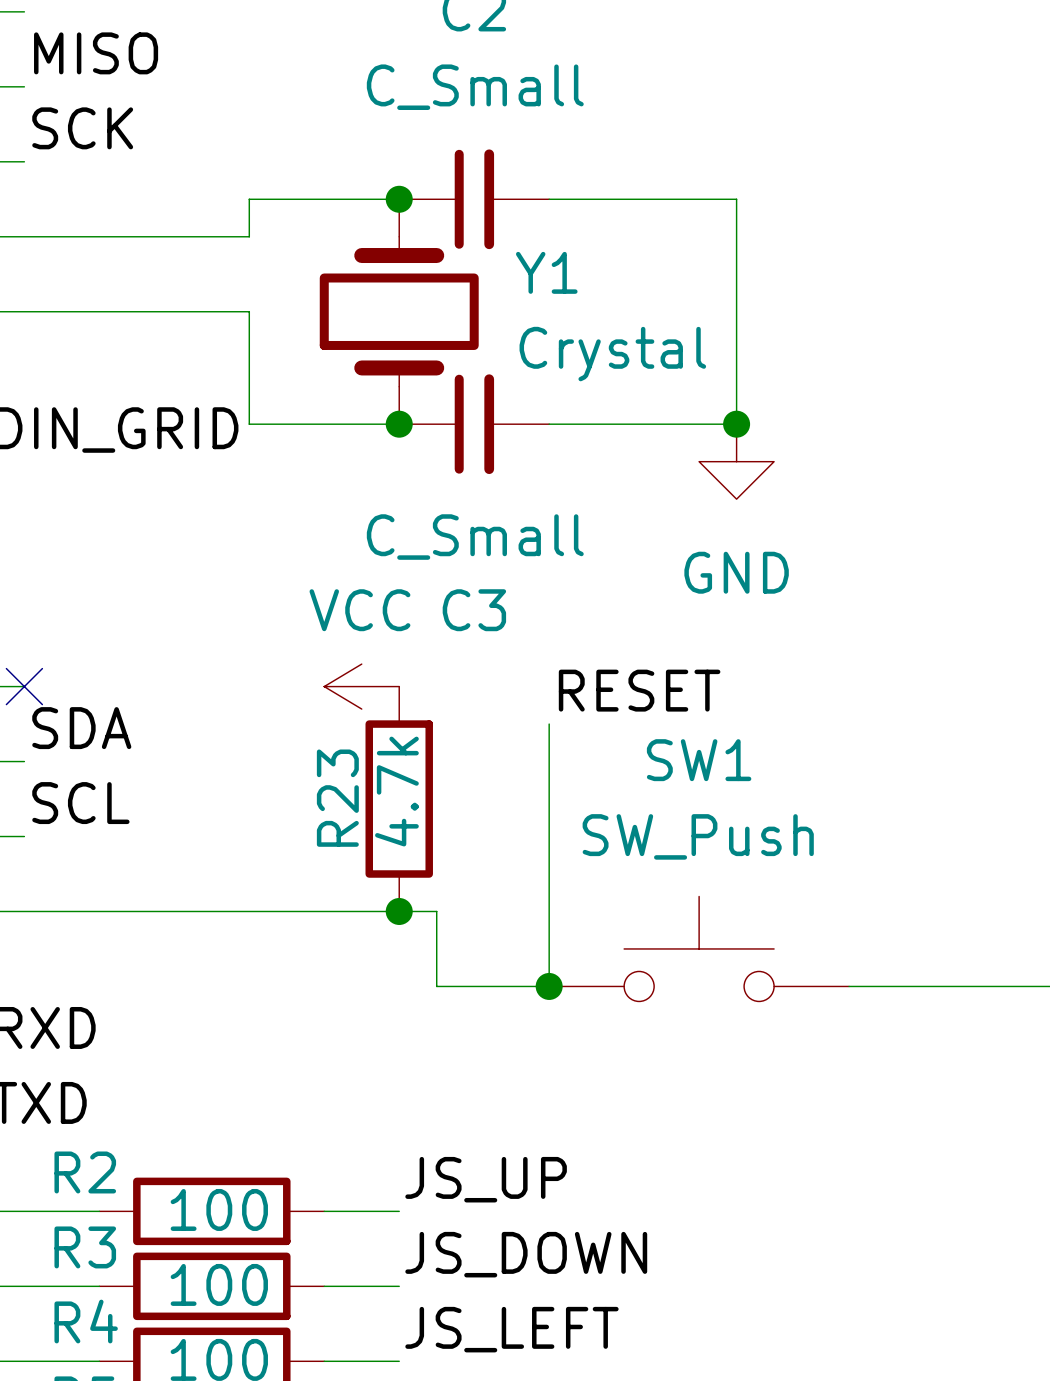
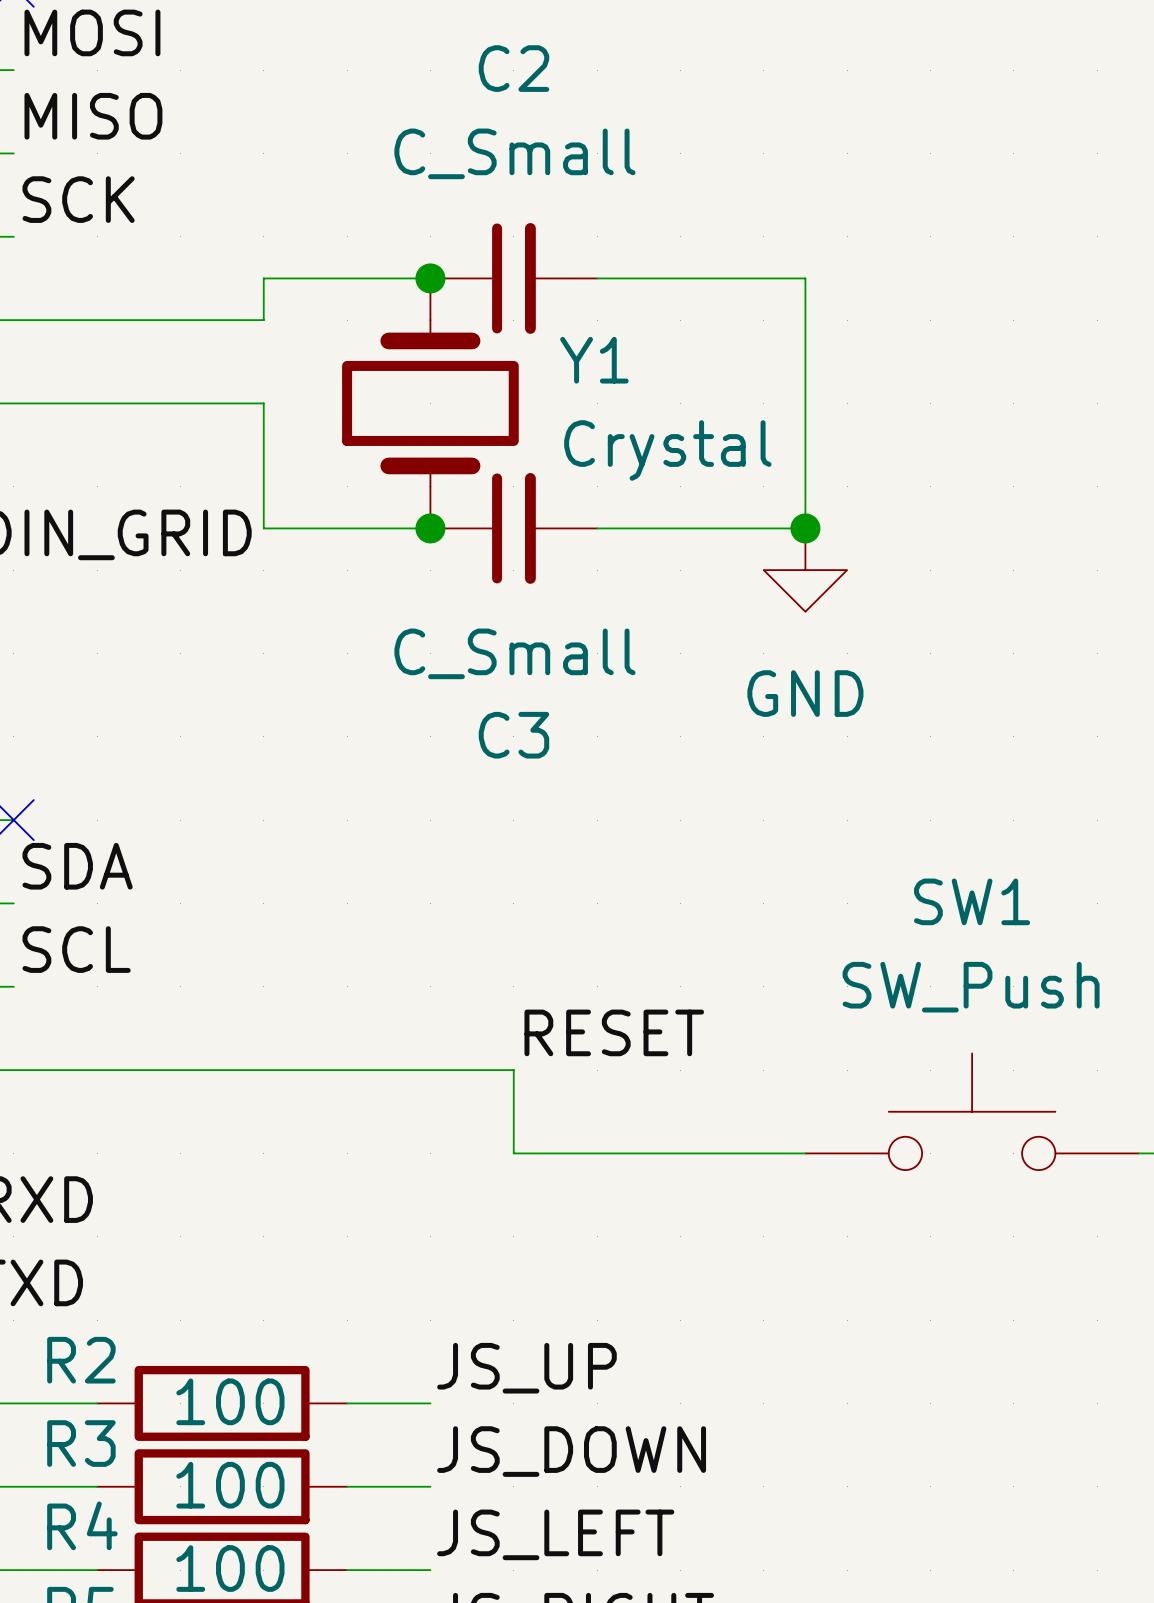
power symbol: VCC (361, 686) -> none
label position: RESET (639, 690) -> RESET (614, 1032)
wire: (549, 724) (549, 986) -> (805, 1153) (597, 1153)
R23: 4.7k (399, 799) -> none
junction: (399, 911) -> none
wire: (436, 911) (436, 986) (474, 986) -> (472, 1070) (513, 1070) (513, 1153)
SW1 position: (699, 948) -> (972, 1111)
junction: (549, 986) -> none
wire: (849, 986) (1036, 986) -> none

